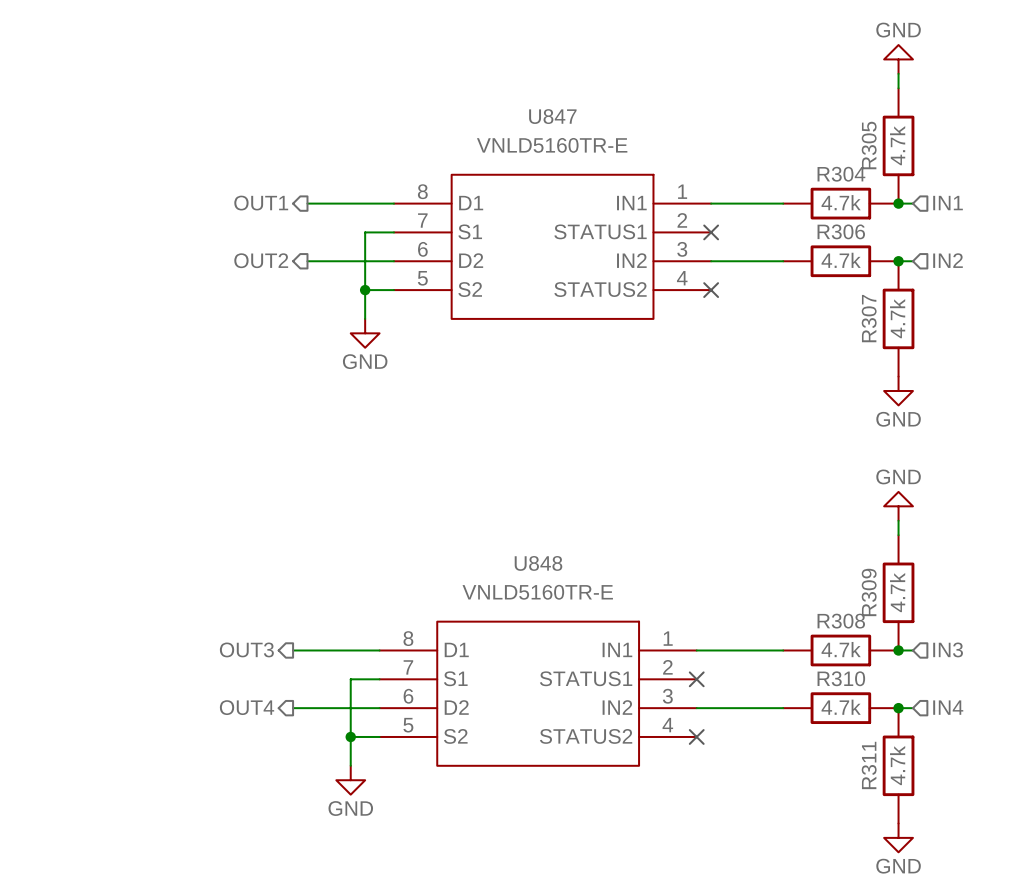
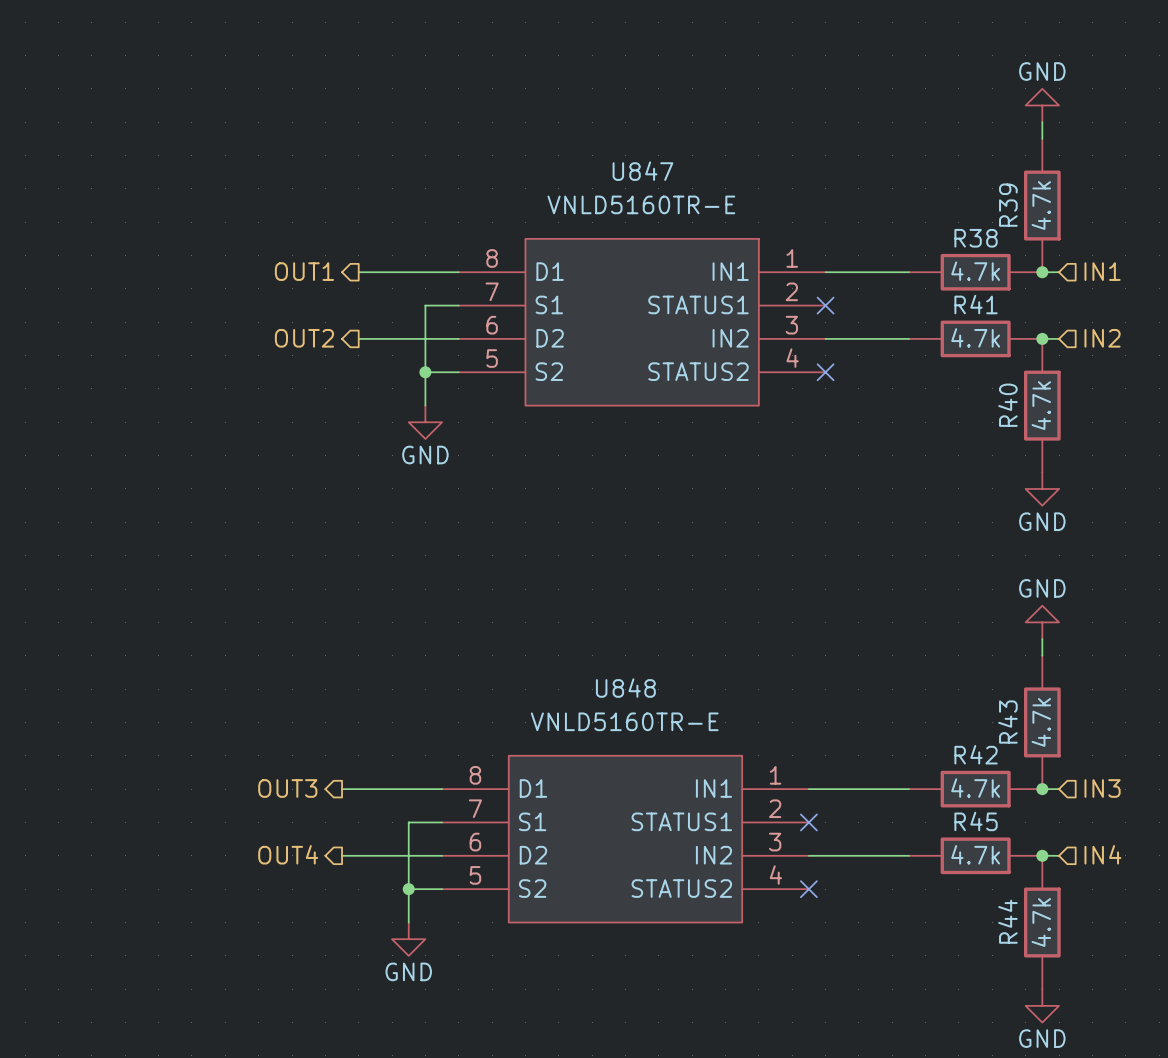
R305 name: R305 (869, 145) -> R39 (1008, 205)
R304 name: R304 (841, 174) -> R38 (976, 238)
R306 name: R306 (841, 231) -> R41 (976, 304)
R307 name: R307 (869, 318) -> R40 (1007, 405)
R309 name: R309 (869, 592) -> R43 (1007, 722)
R308 name: R308 (841, 621) -> R42 (976, 754)
R310 name: R310 (841, 678) -> R45 (976, 821)
R311 name: R311 (869, 765) -> R44 (1007, 921)

